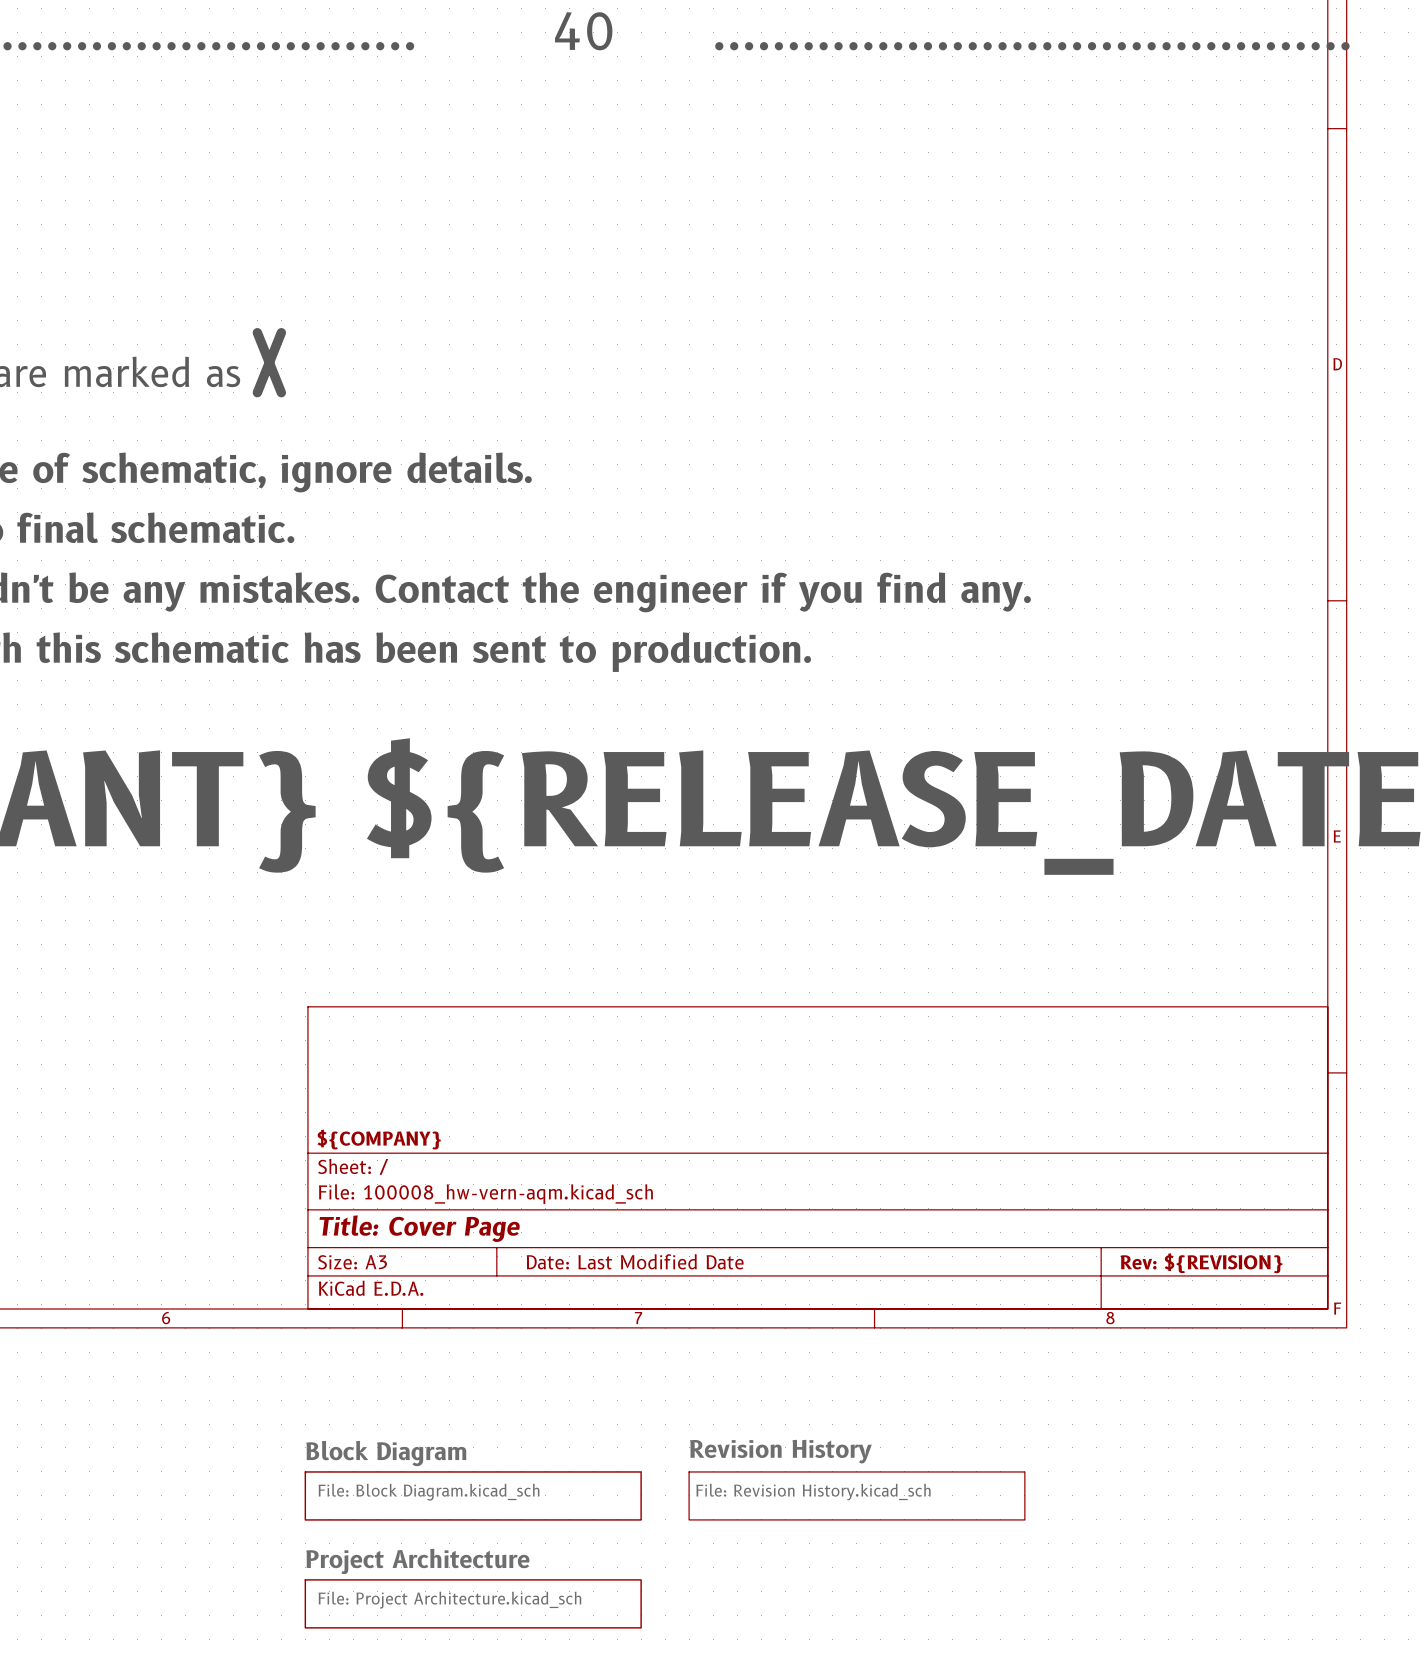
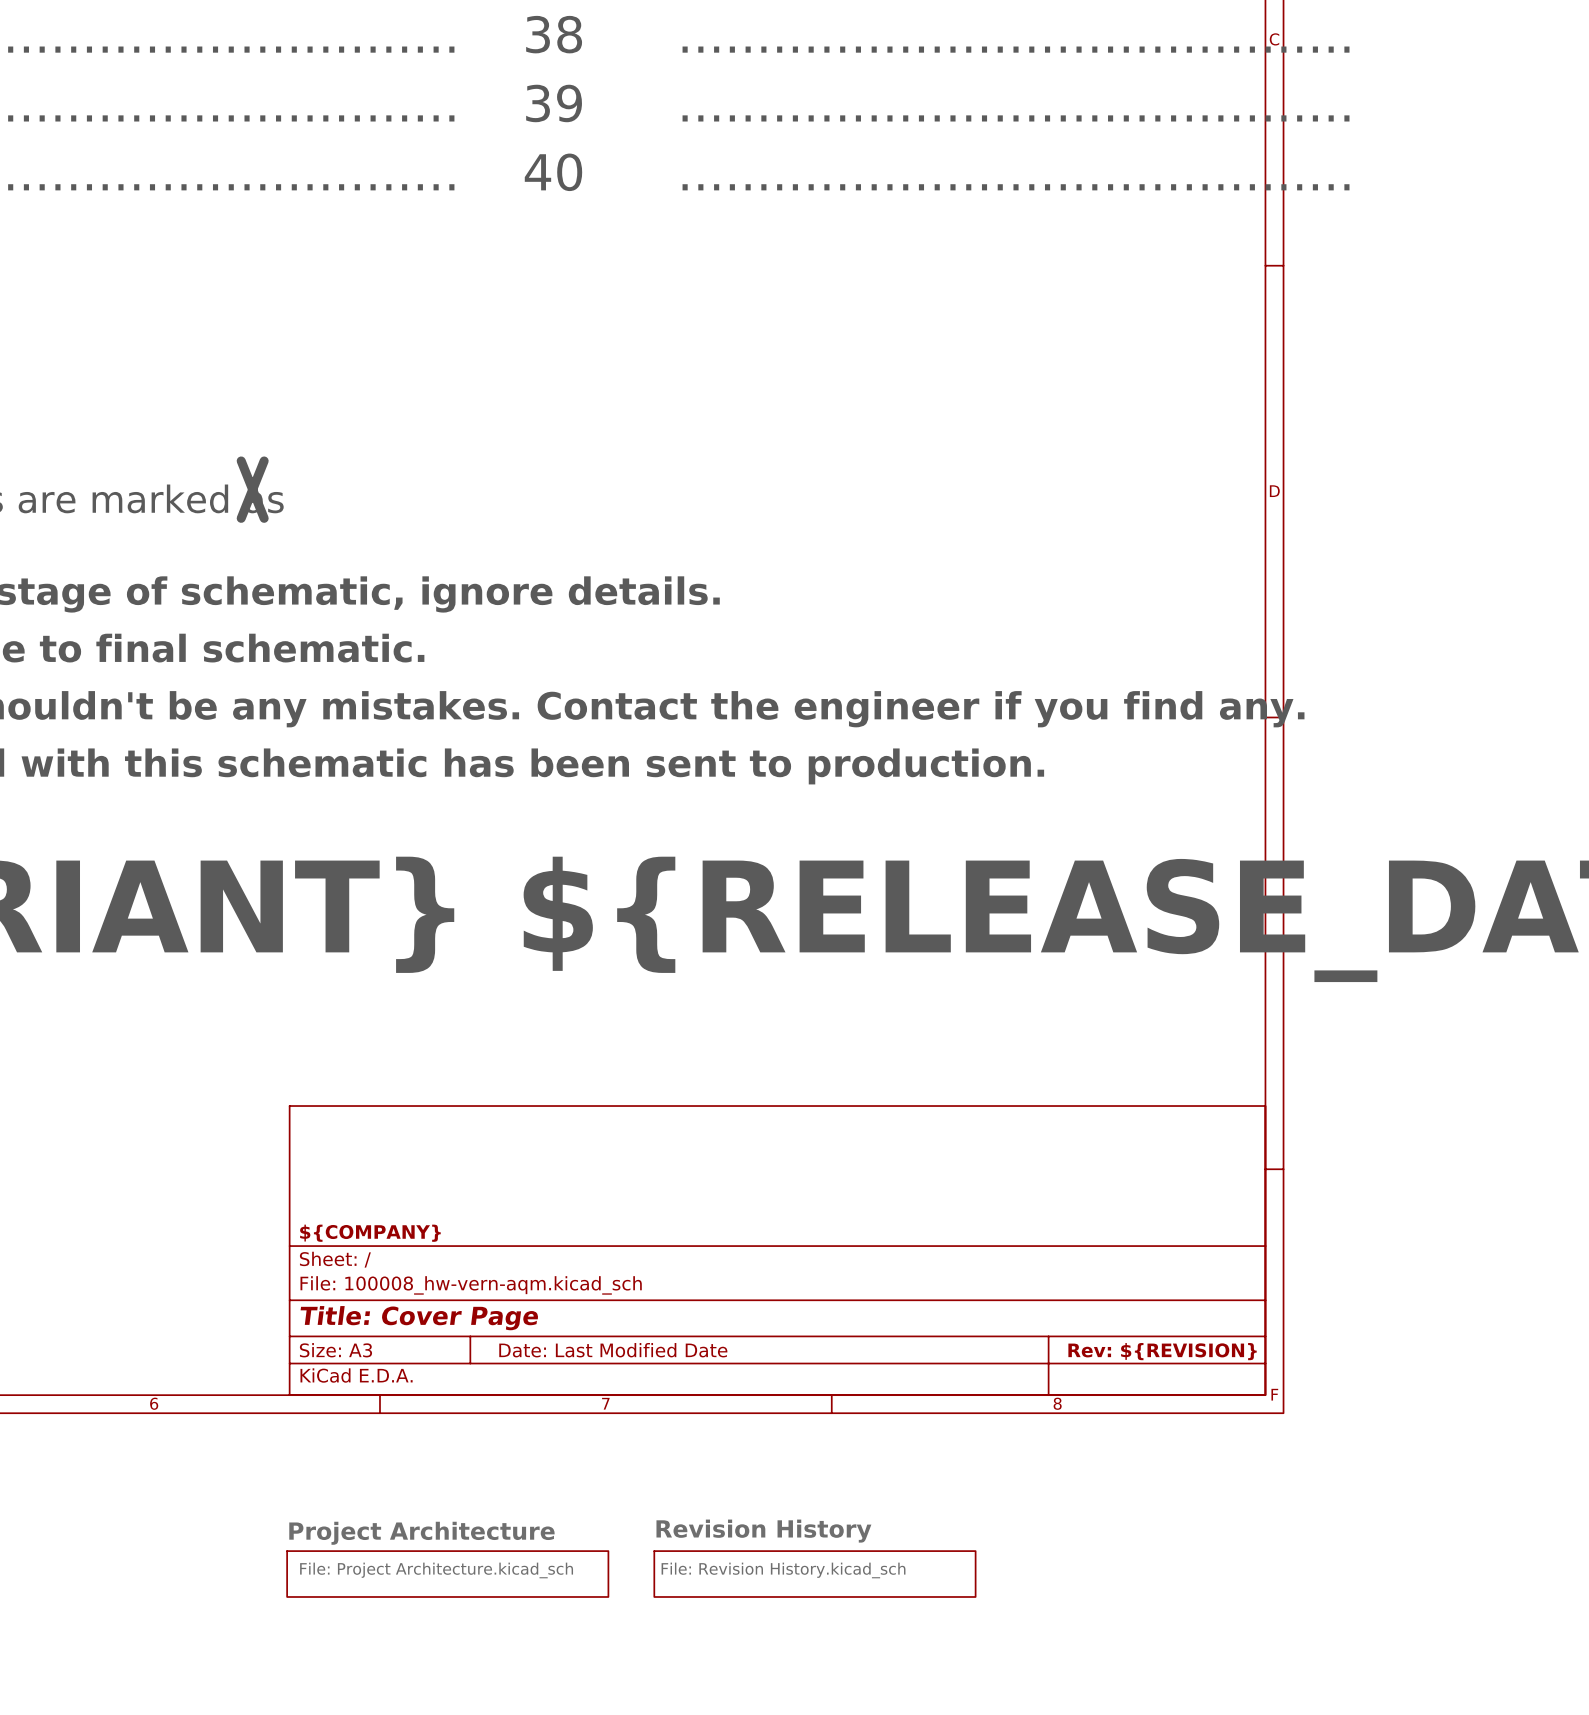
sheet Block Diagram name: Block Diagram (386, 1453) -> Project Architecture (421, 1533)
sheet Block Diagram value: File: Block Diagram.kicad_sch (429, 1492) -> File: Project Architecture.kicad_sch (436, 1570)
sheet Project Architecture: File: Project Architecture.kicad_sch (473, 1603) -> none

